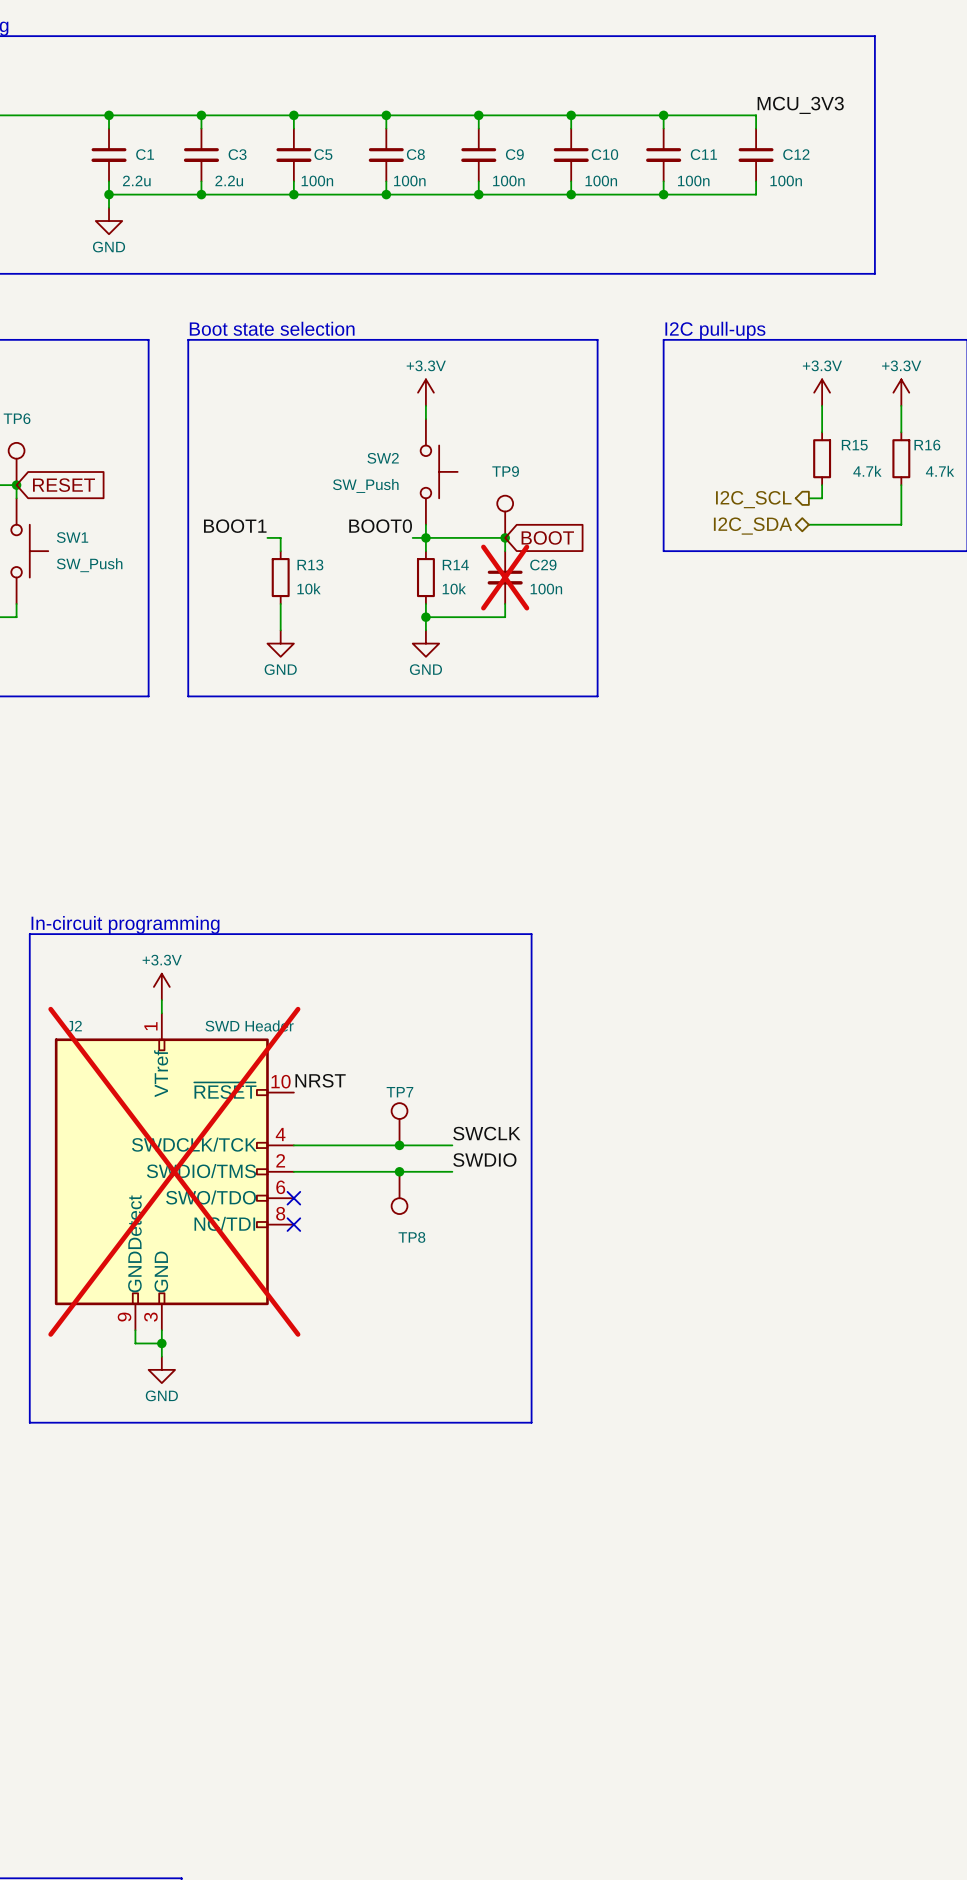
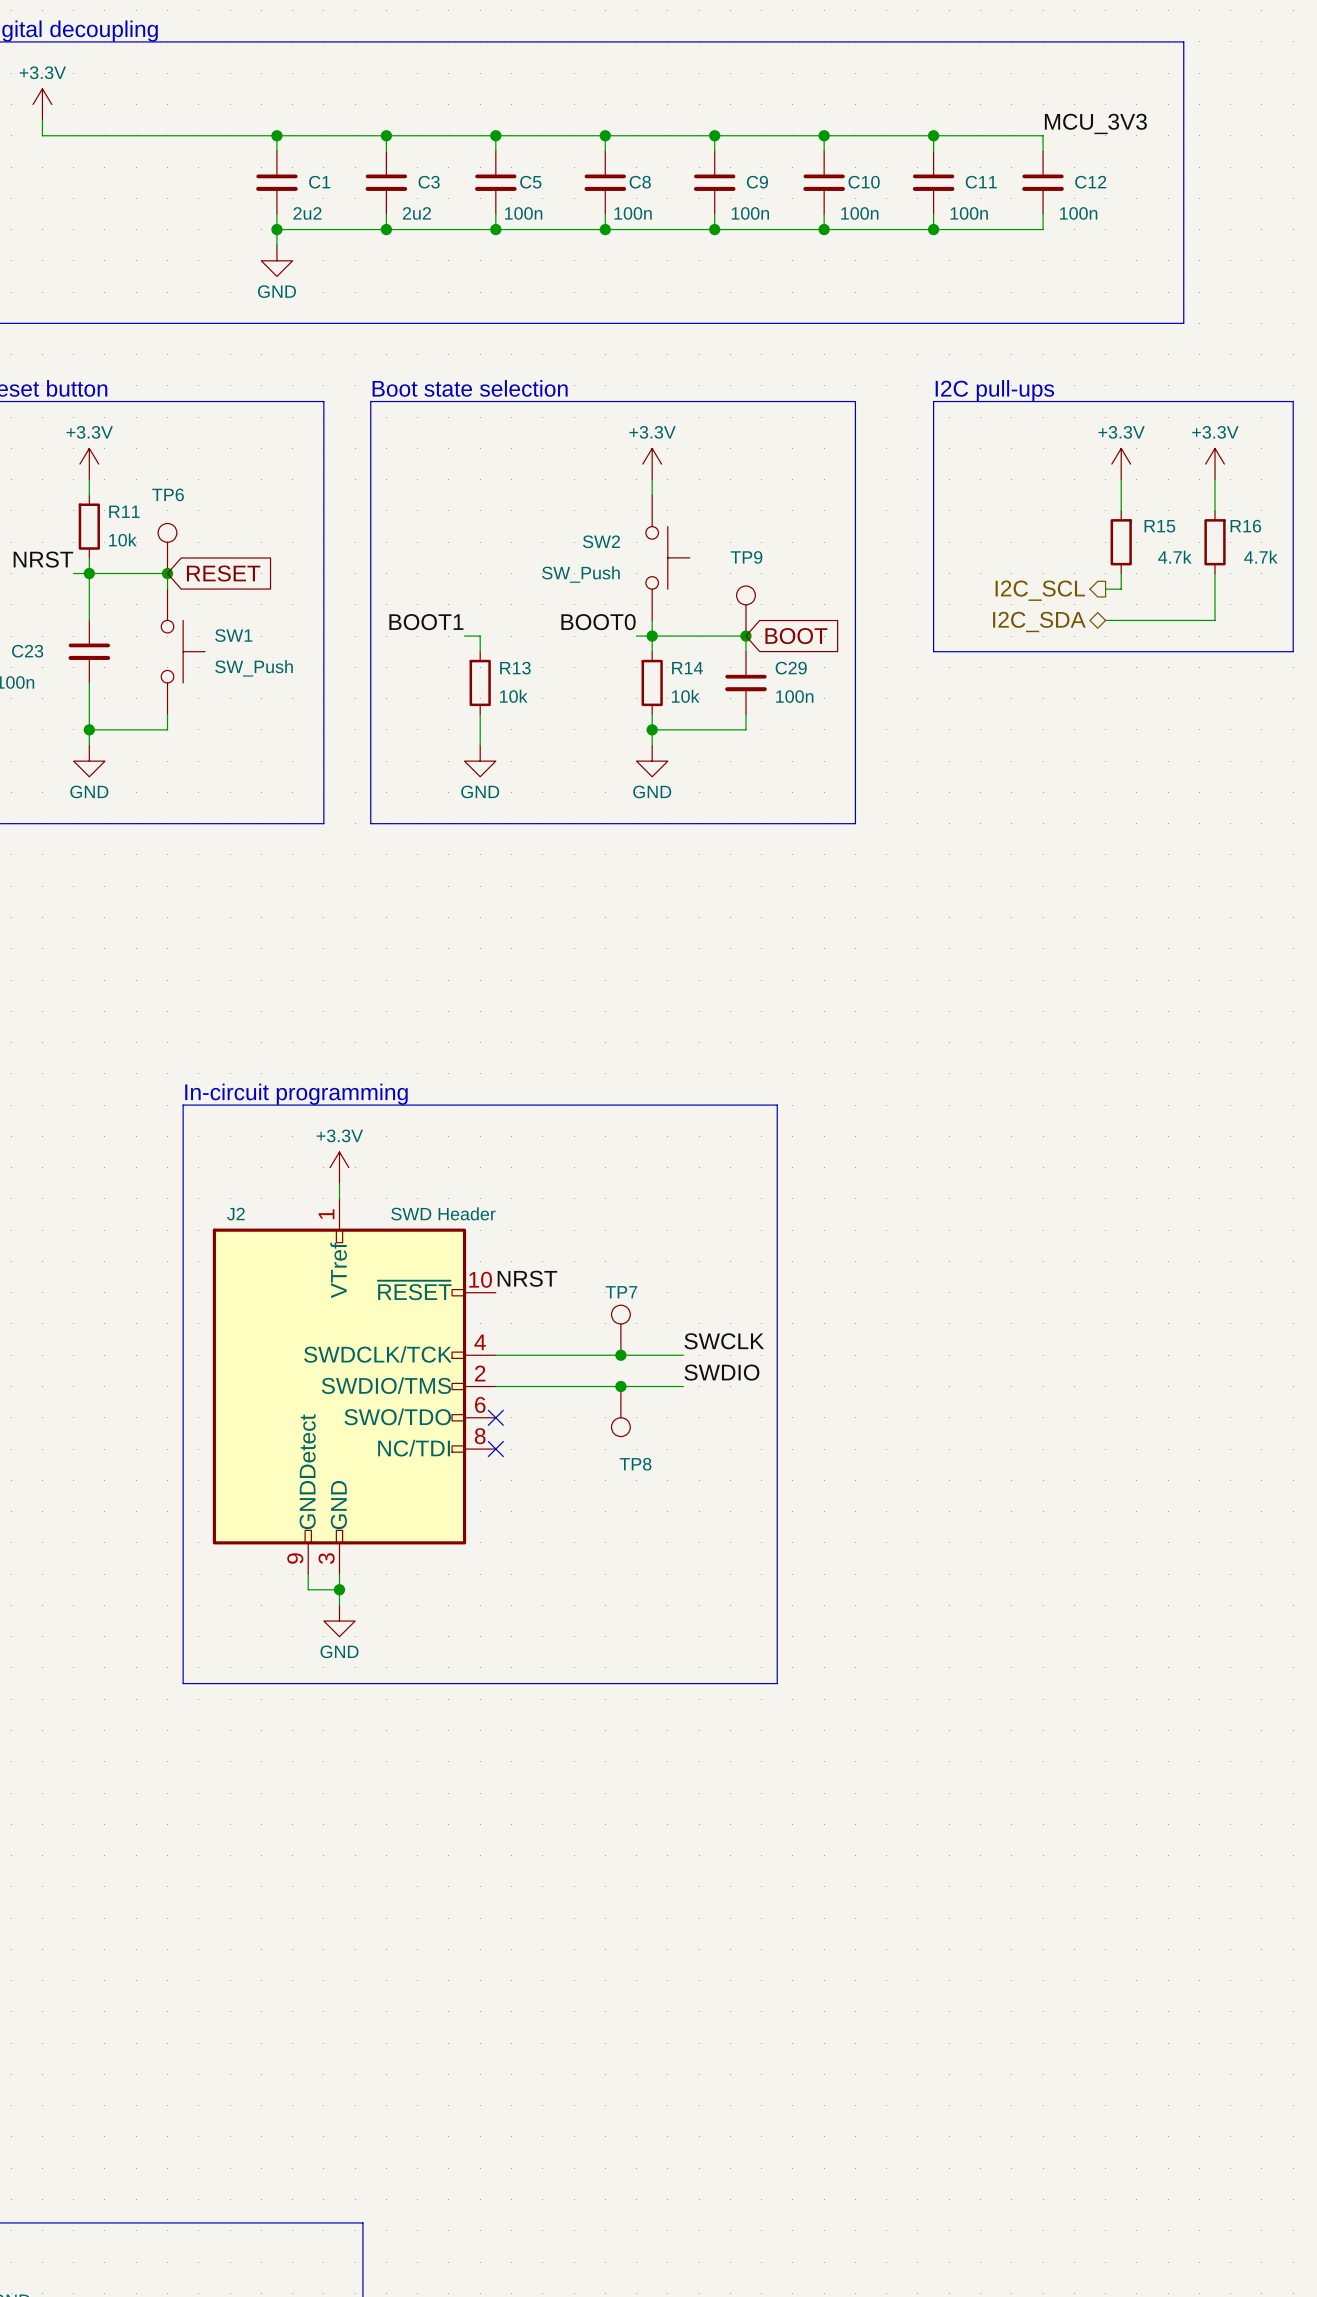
C1 value: 2.2u (136, 181) -> 2u2 (307, 213)
C3 value: 2.2u (229, 181) -> 2u2 (416, 213)
C29 do-not-place cross: (505, 577) -> none
J2 do-not-place cross: (174, 1171) -> none

